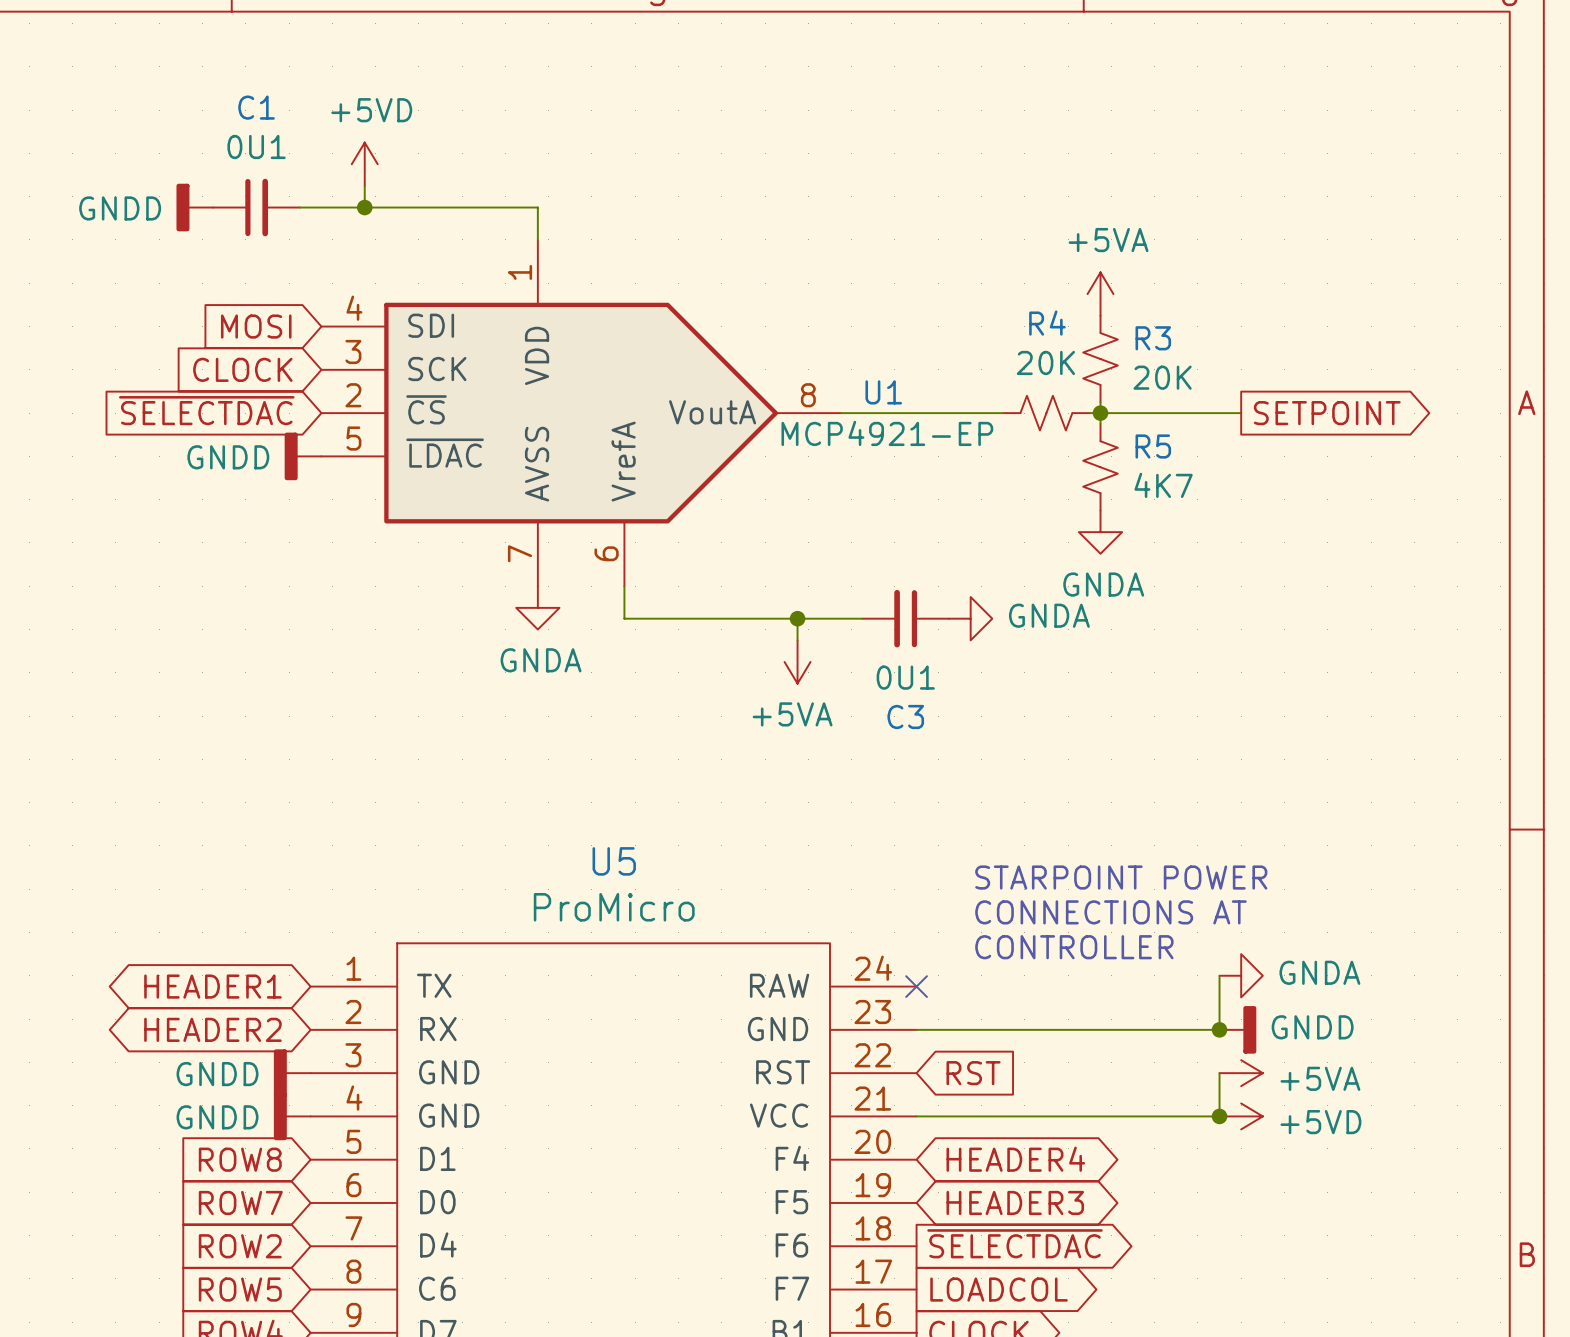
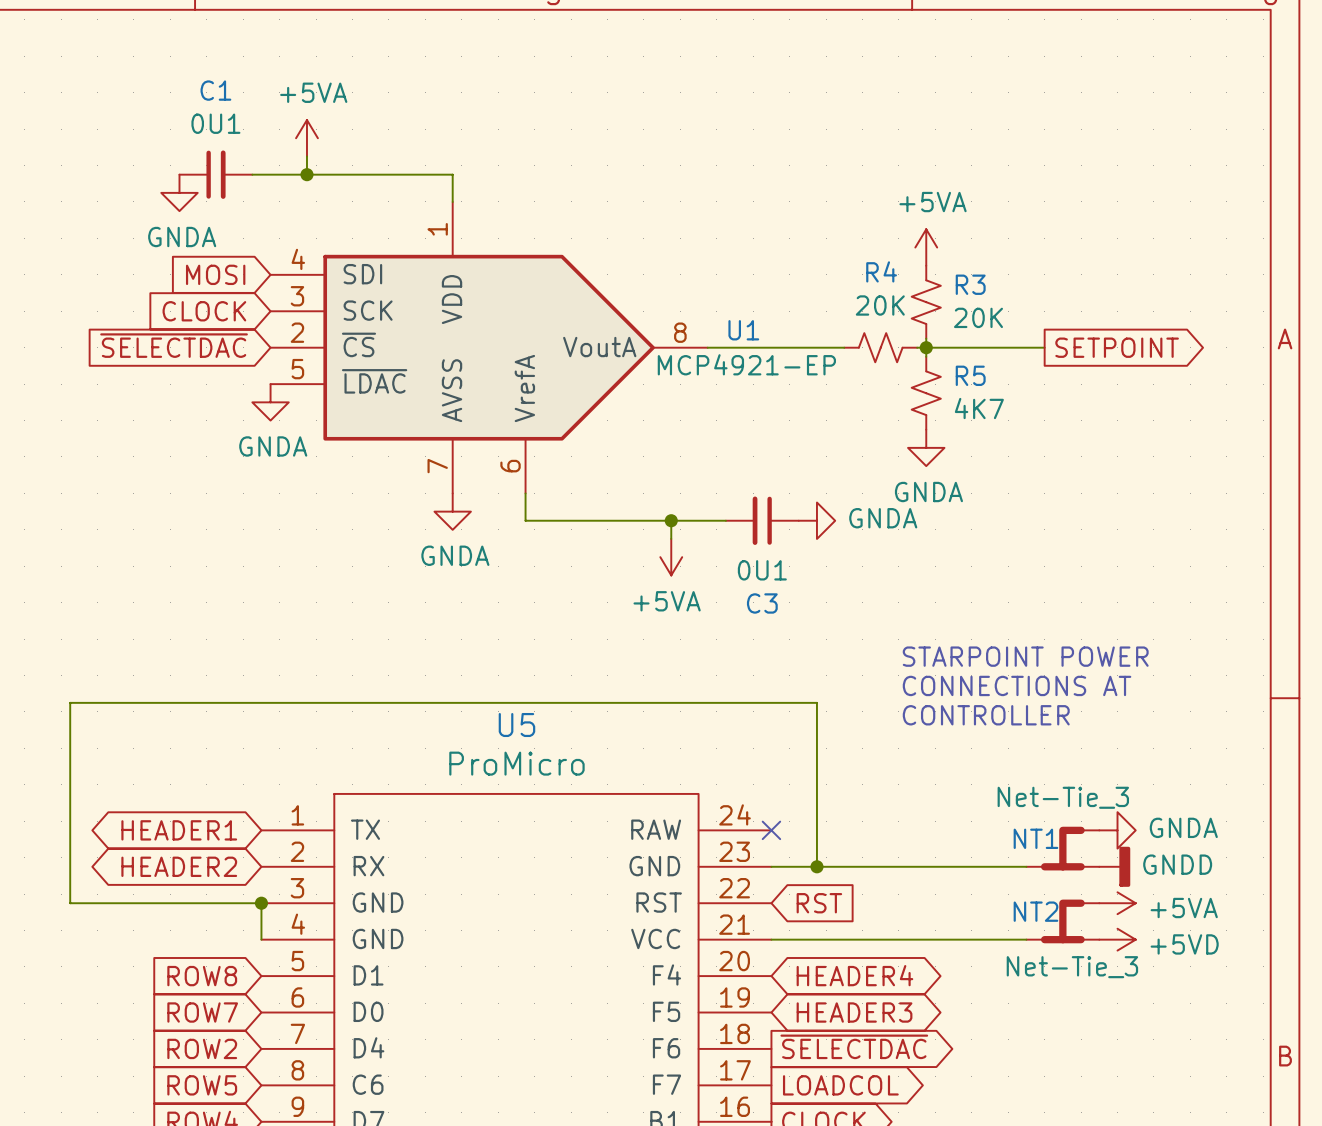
power symbol: +5VD (364, 164) -> +5VA (306, 138)
power symbol: GNDD (194, 207) -> none
power symbol: none -> GNDA (179, 192)
power symbol: GNDD (303, 456) -> none
power symbol: none -> GNDA (270, 402)
text position: STARPOINT POWER (1121, 877) -> STARPOINT POWER (1025, 656)
text position: CONNECTIONS AT (1110, 912) -> CONNECTIONS AT (1017, 685)
text position: CONTROLLER (1074, 947) -> CONTROLLER (986, 715)
wire: (1219, 975) (1219, 1029) -> none
power symbol position: GNDA (1241, 975) -> GNDA (1117, 830)
NT1: none -> Net-Tie_3 (1062, 848)
wire: none -> (816, 866) (816, 702) (70, 702) (70, 903) (261, 903) (261, 939)
junction: none -> (816, 866)
junction: (1219, 1029) -> none
power symbol position: GNDD (1237, 1029) -> GNDD (1114, 866)
power symbol: GNDD (292, 1073) -> none
junction: none -> (261, 903)
wire: (1219, 1073) (1219, 1116) -> none
power symbol position: +5VA (1241, 1073) -> +5VA (1117, 903)
NT2: none -> Net-Tie_3 (1062, 921)
power symbol: GNDD (292, 1116) -> none
junction: (1219, 1116) -> none
power symbol position: +5VD (1241, 1116) -> +5VD (1117, 939)

